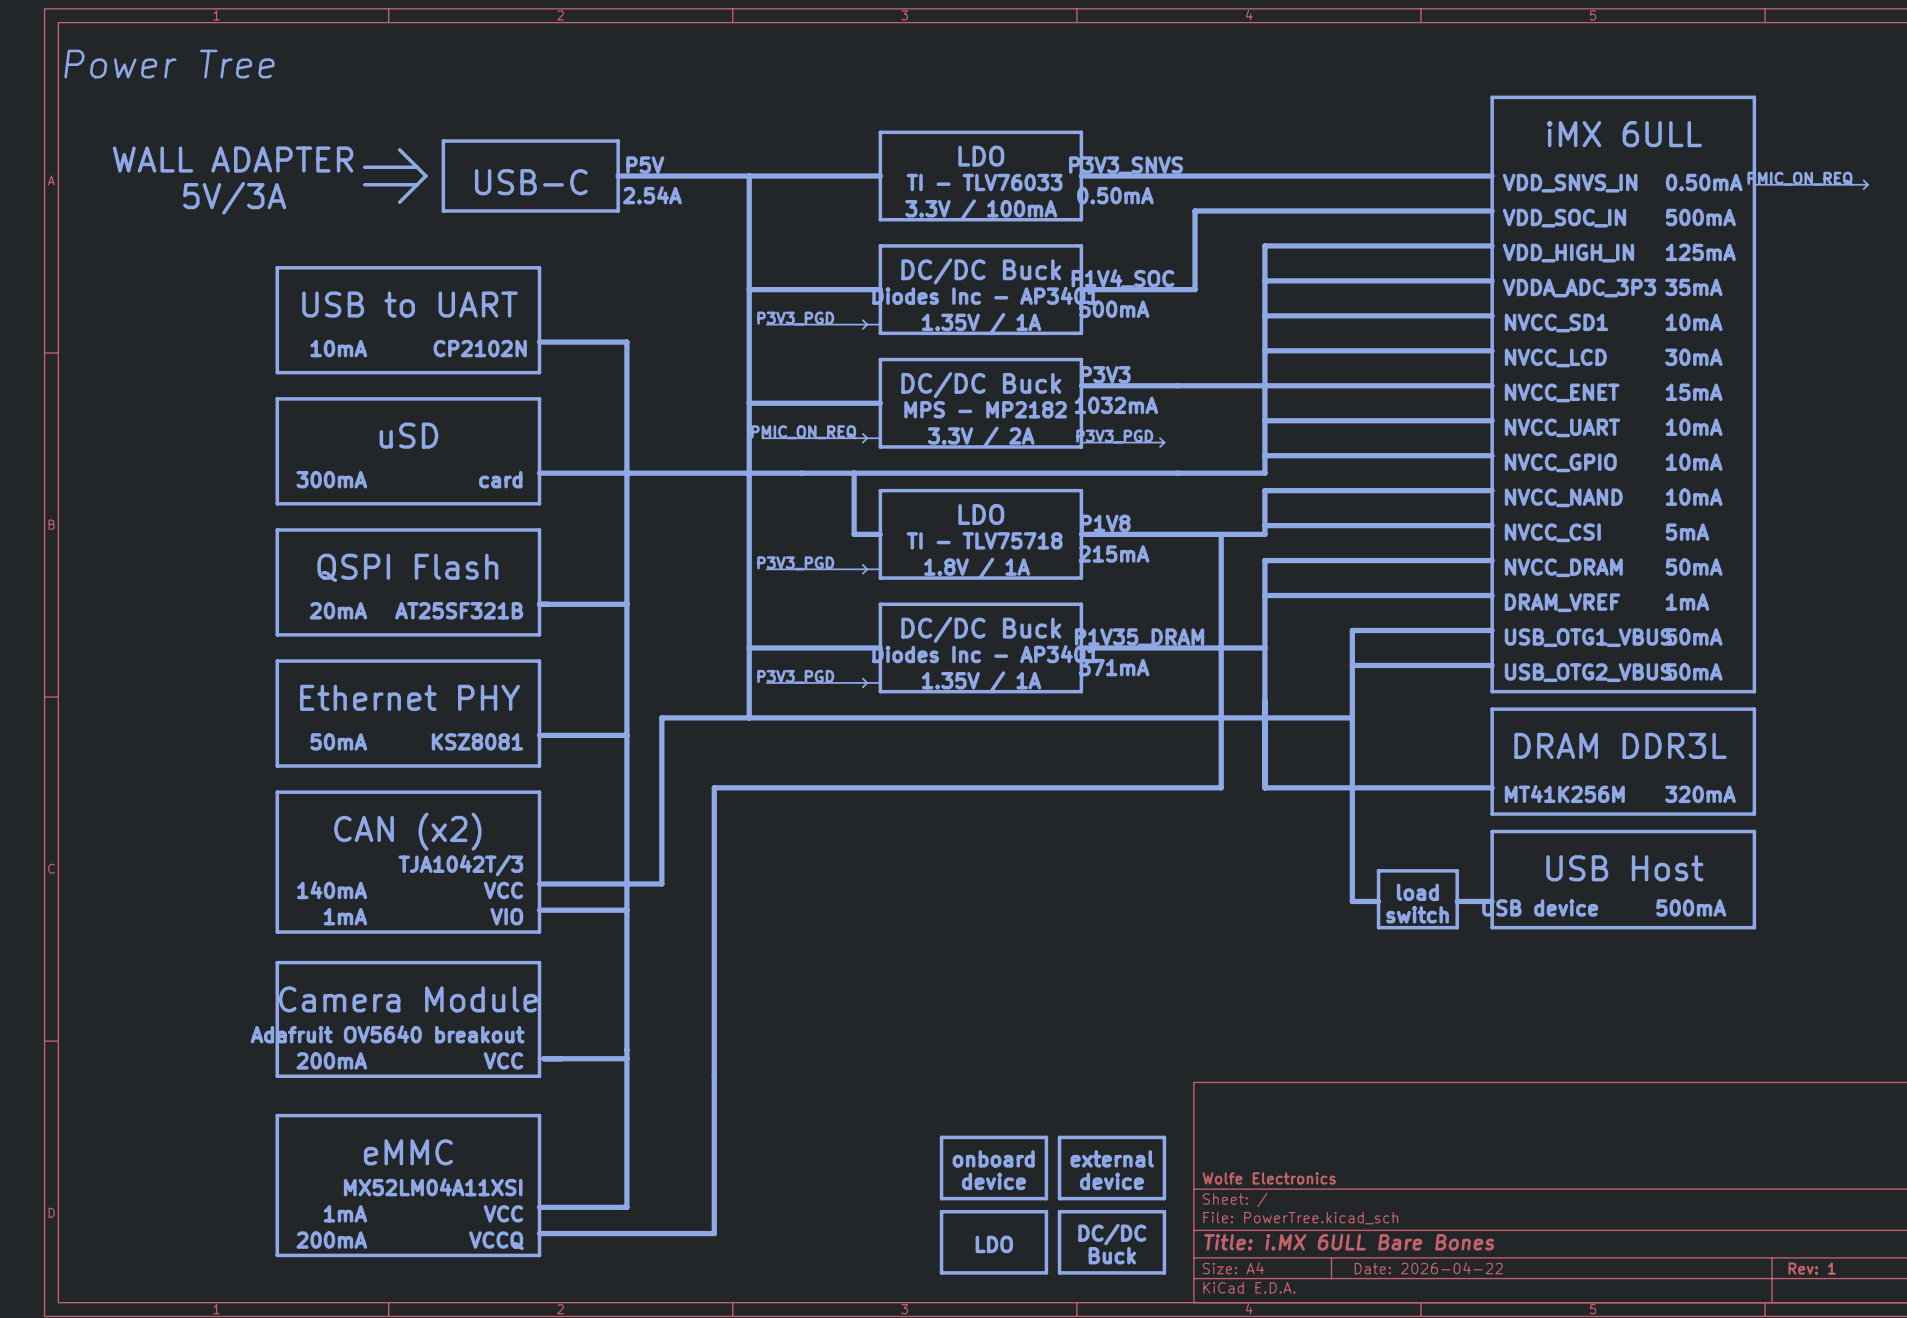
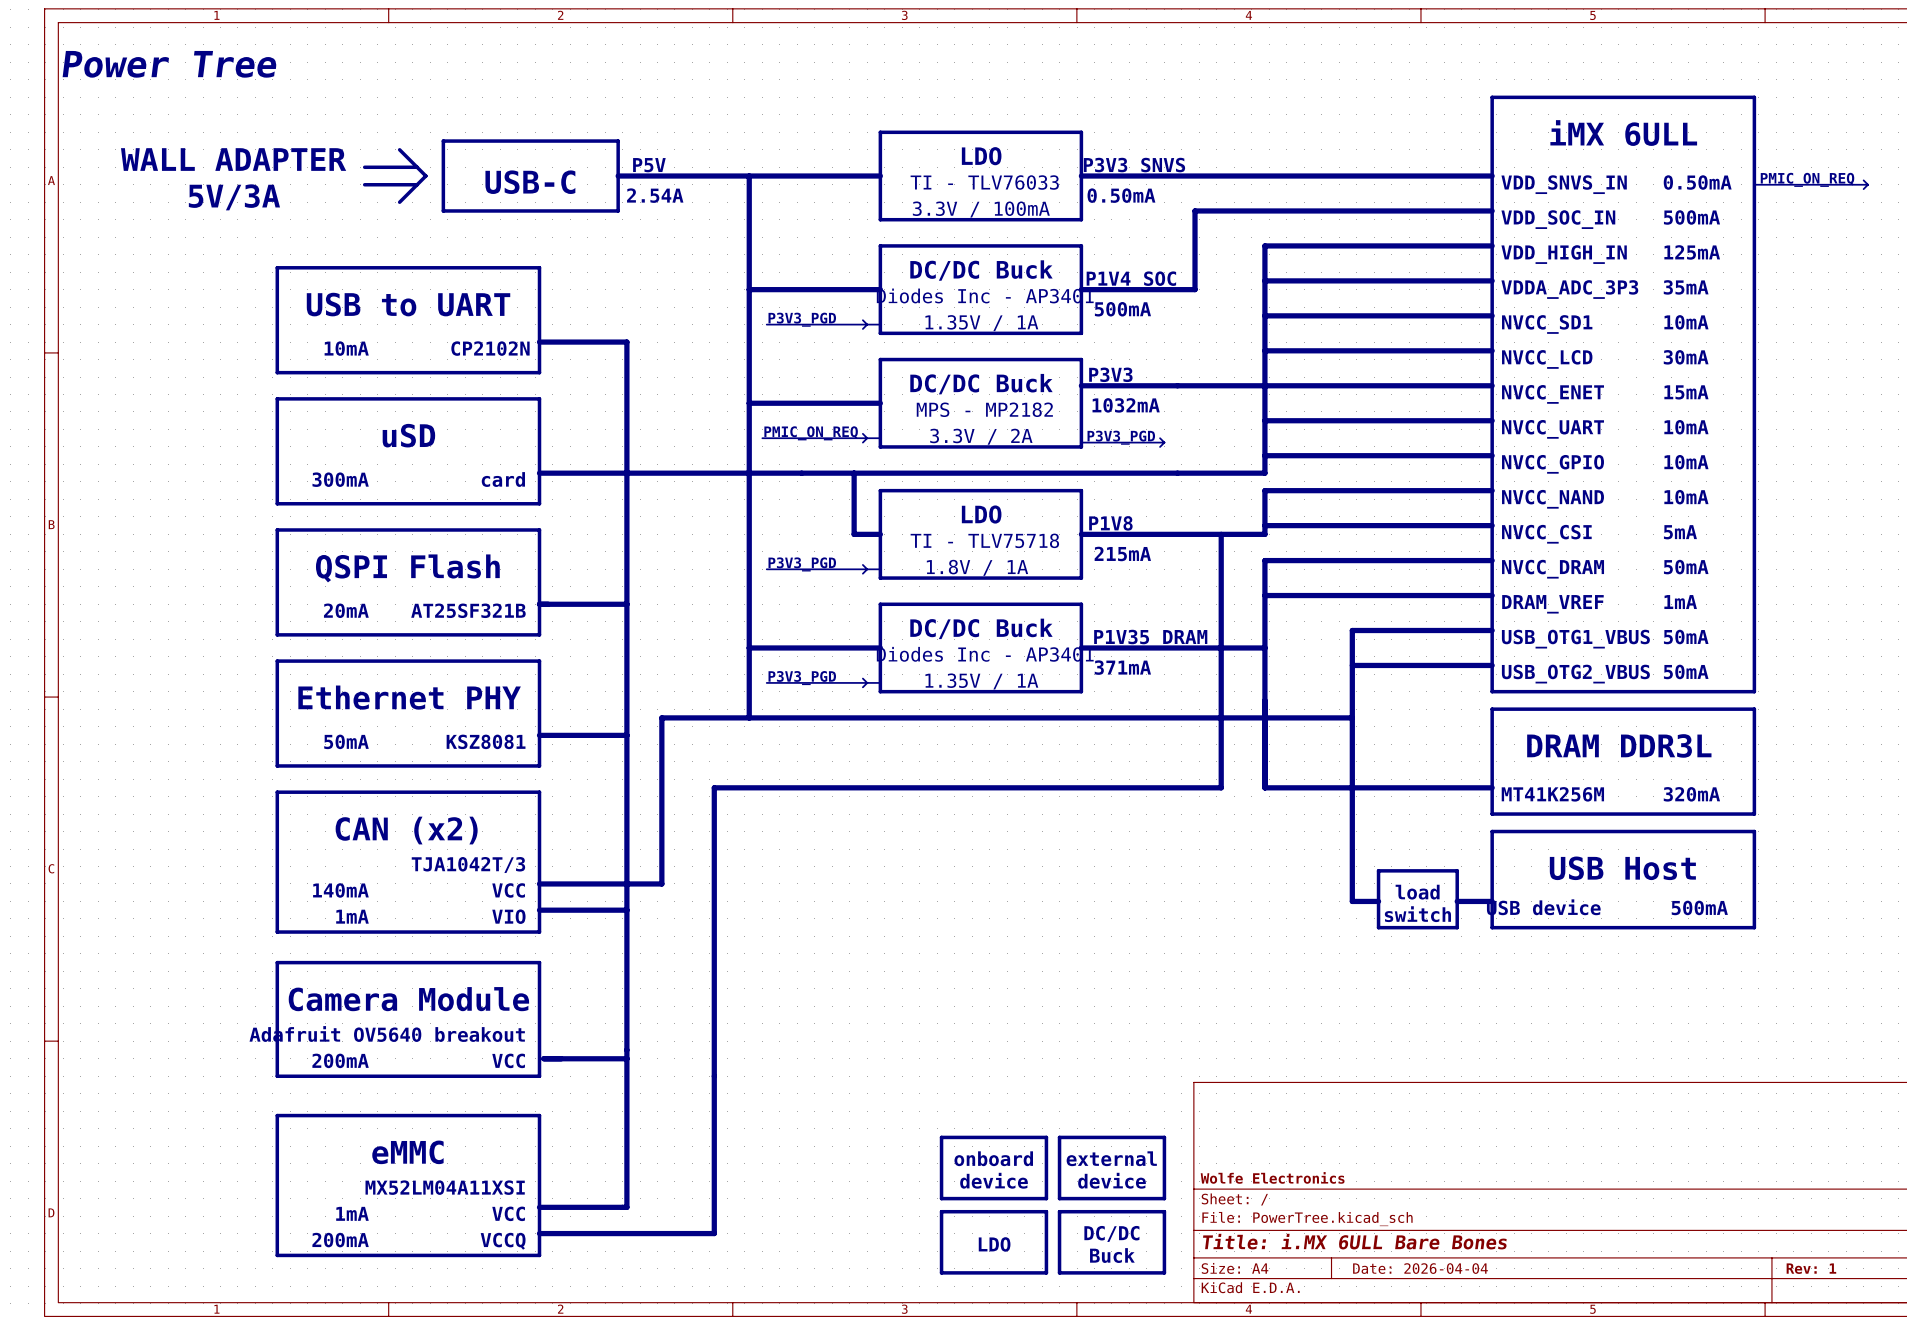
title block: Date: 2026-04-22 (1428, 1268) -> Date: 2026-04-04 (1420, 1268)

